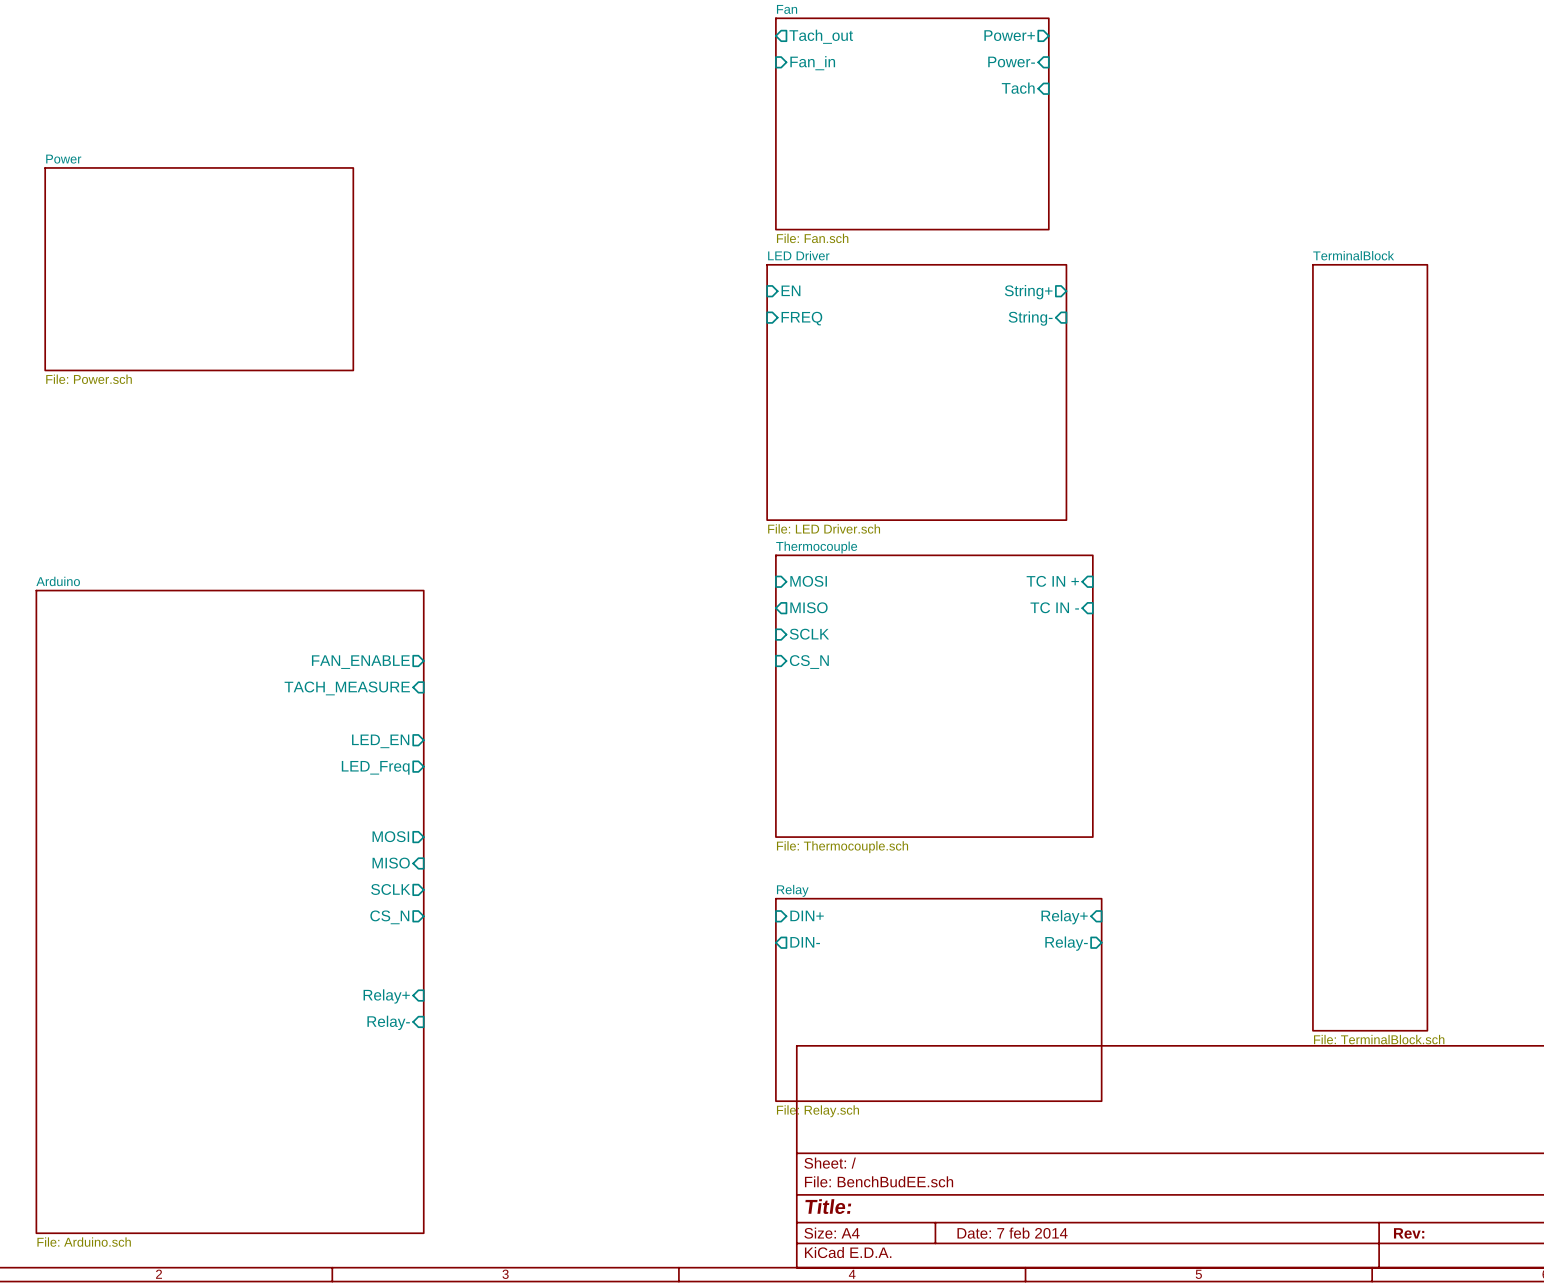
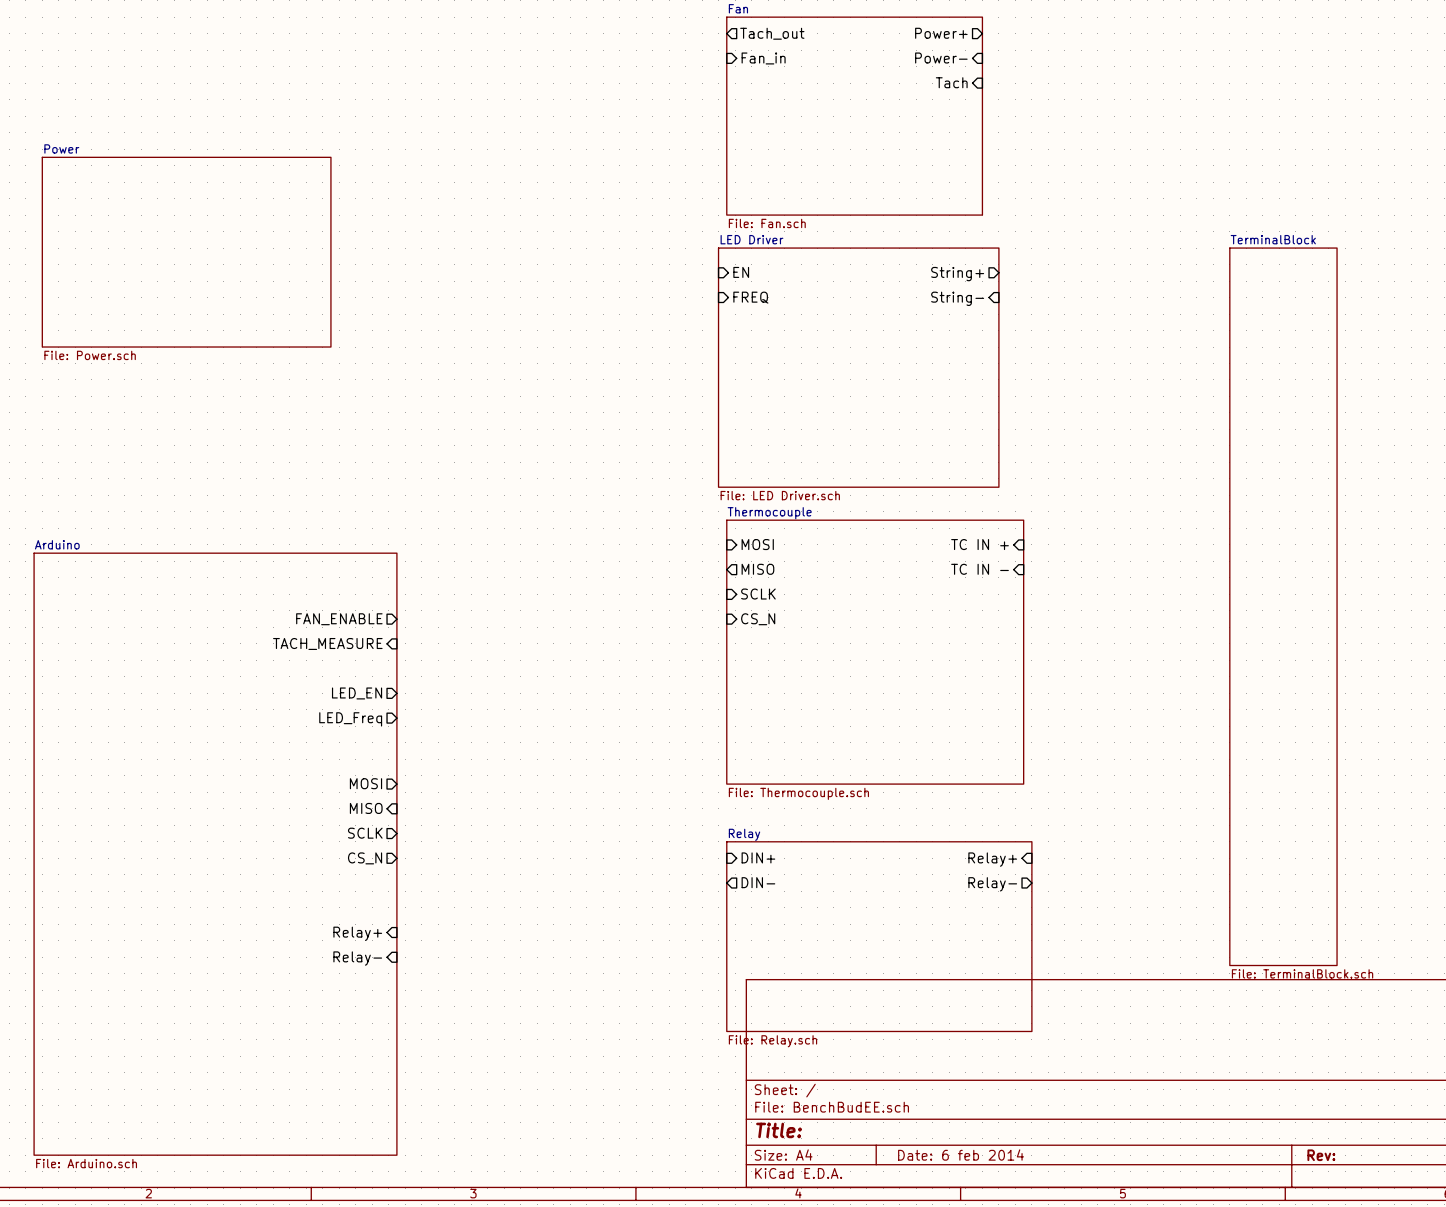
title block: Date: 7 feb 2014 (1012, 1233) -> Date: 6 feb 2014 (961, 1155)

